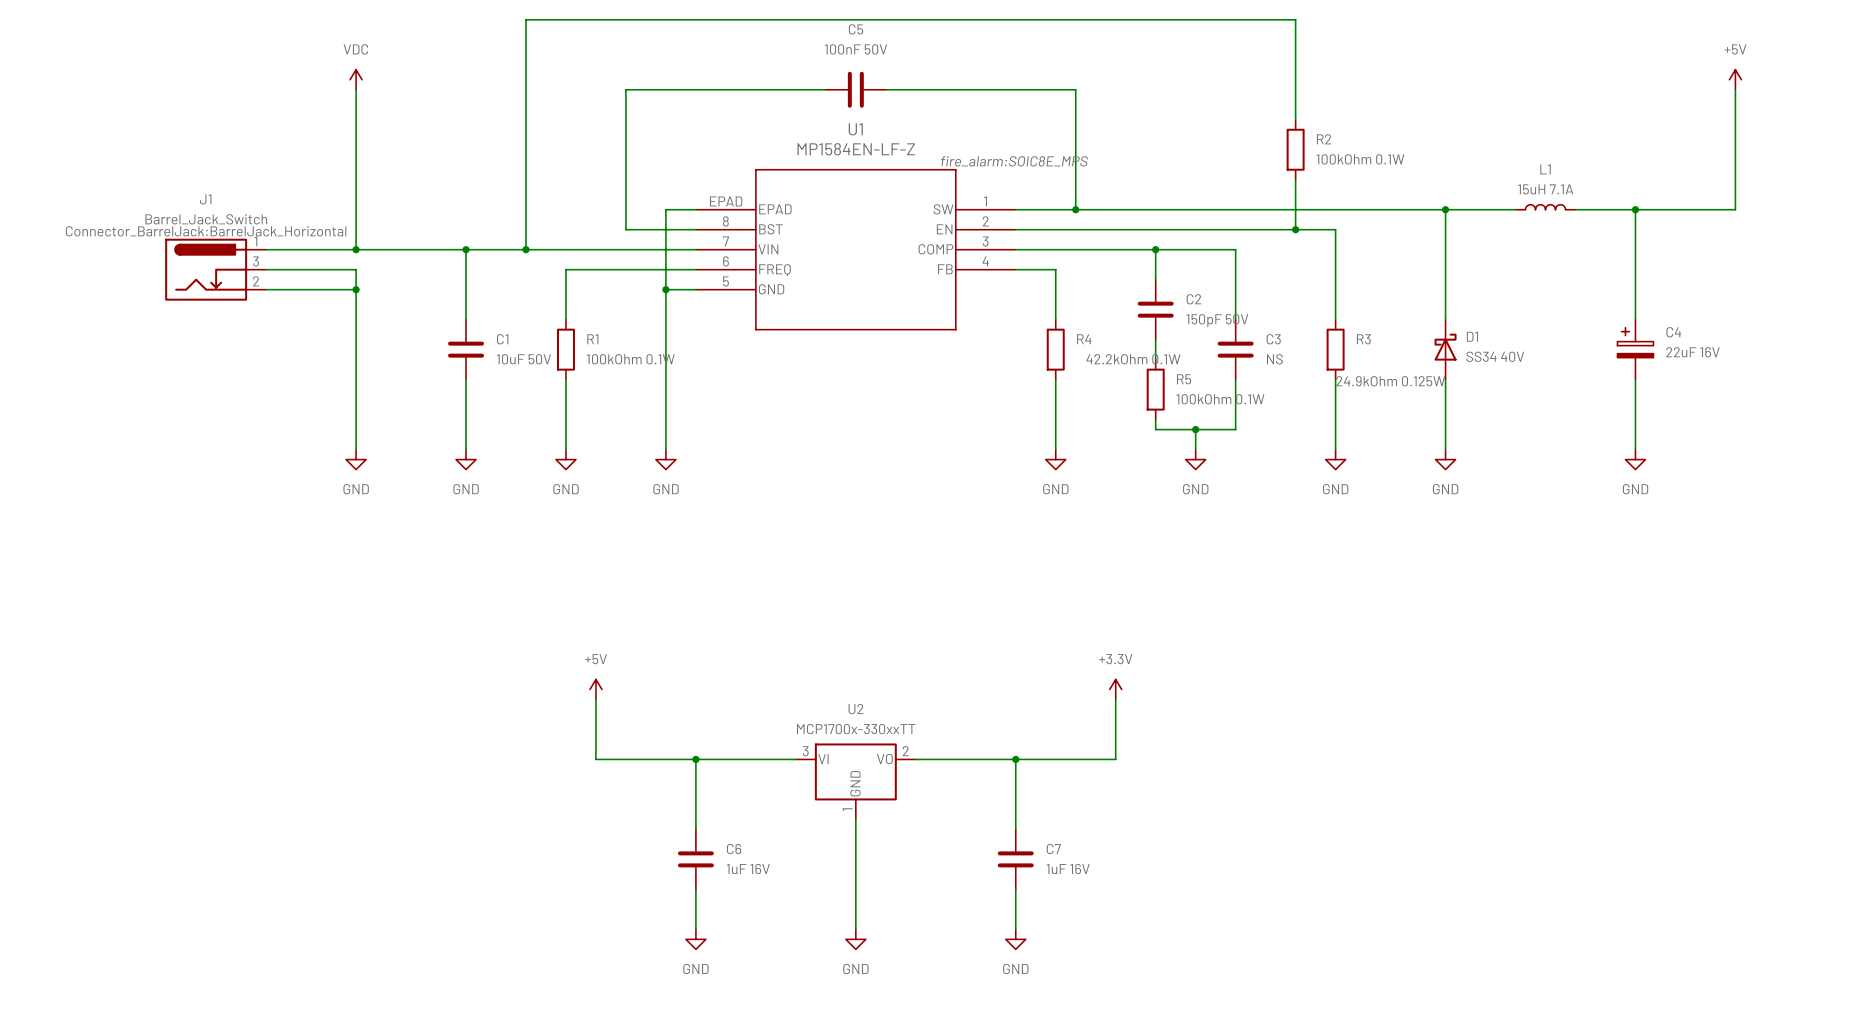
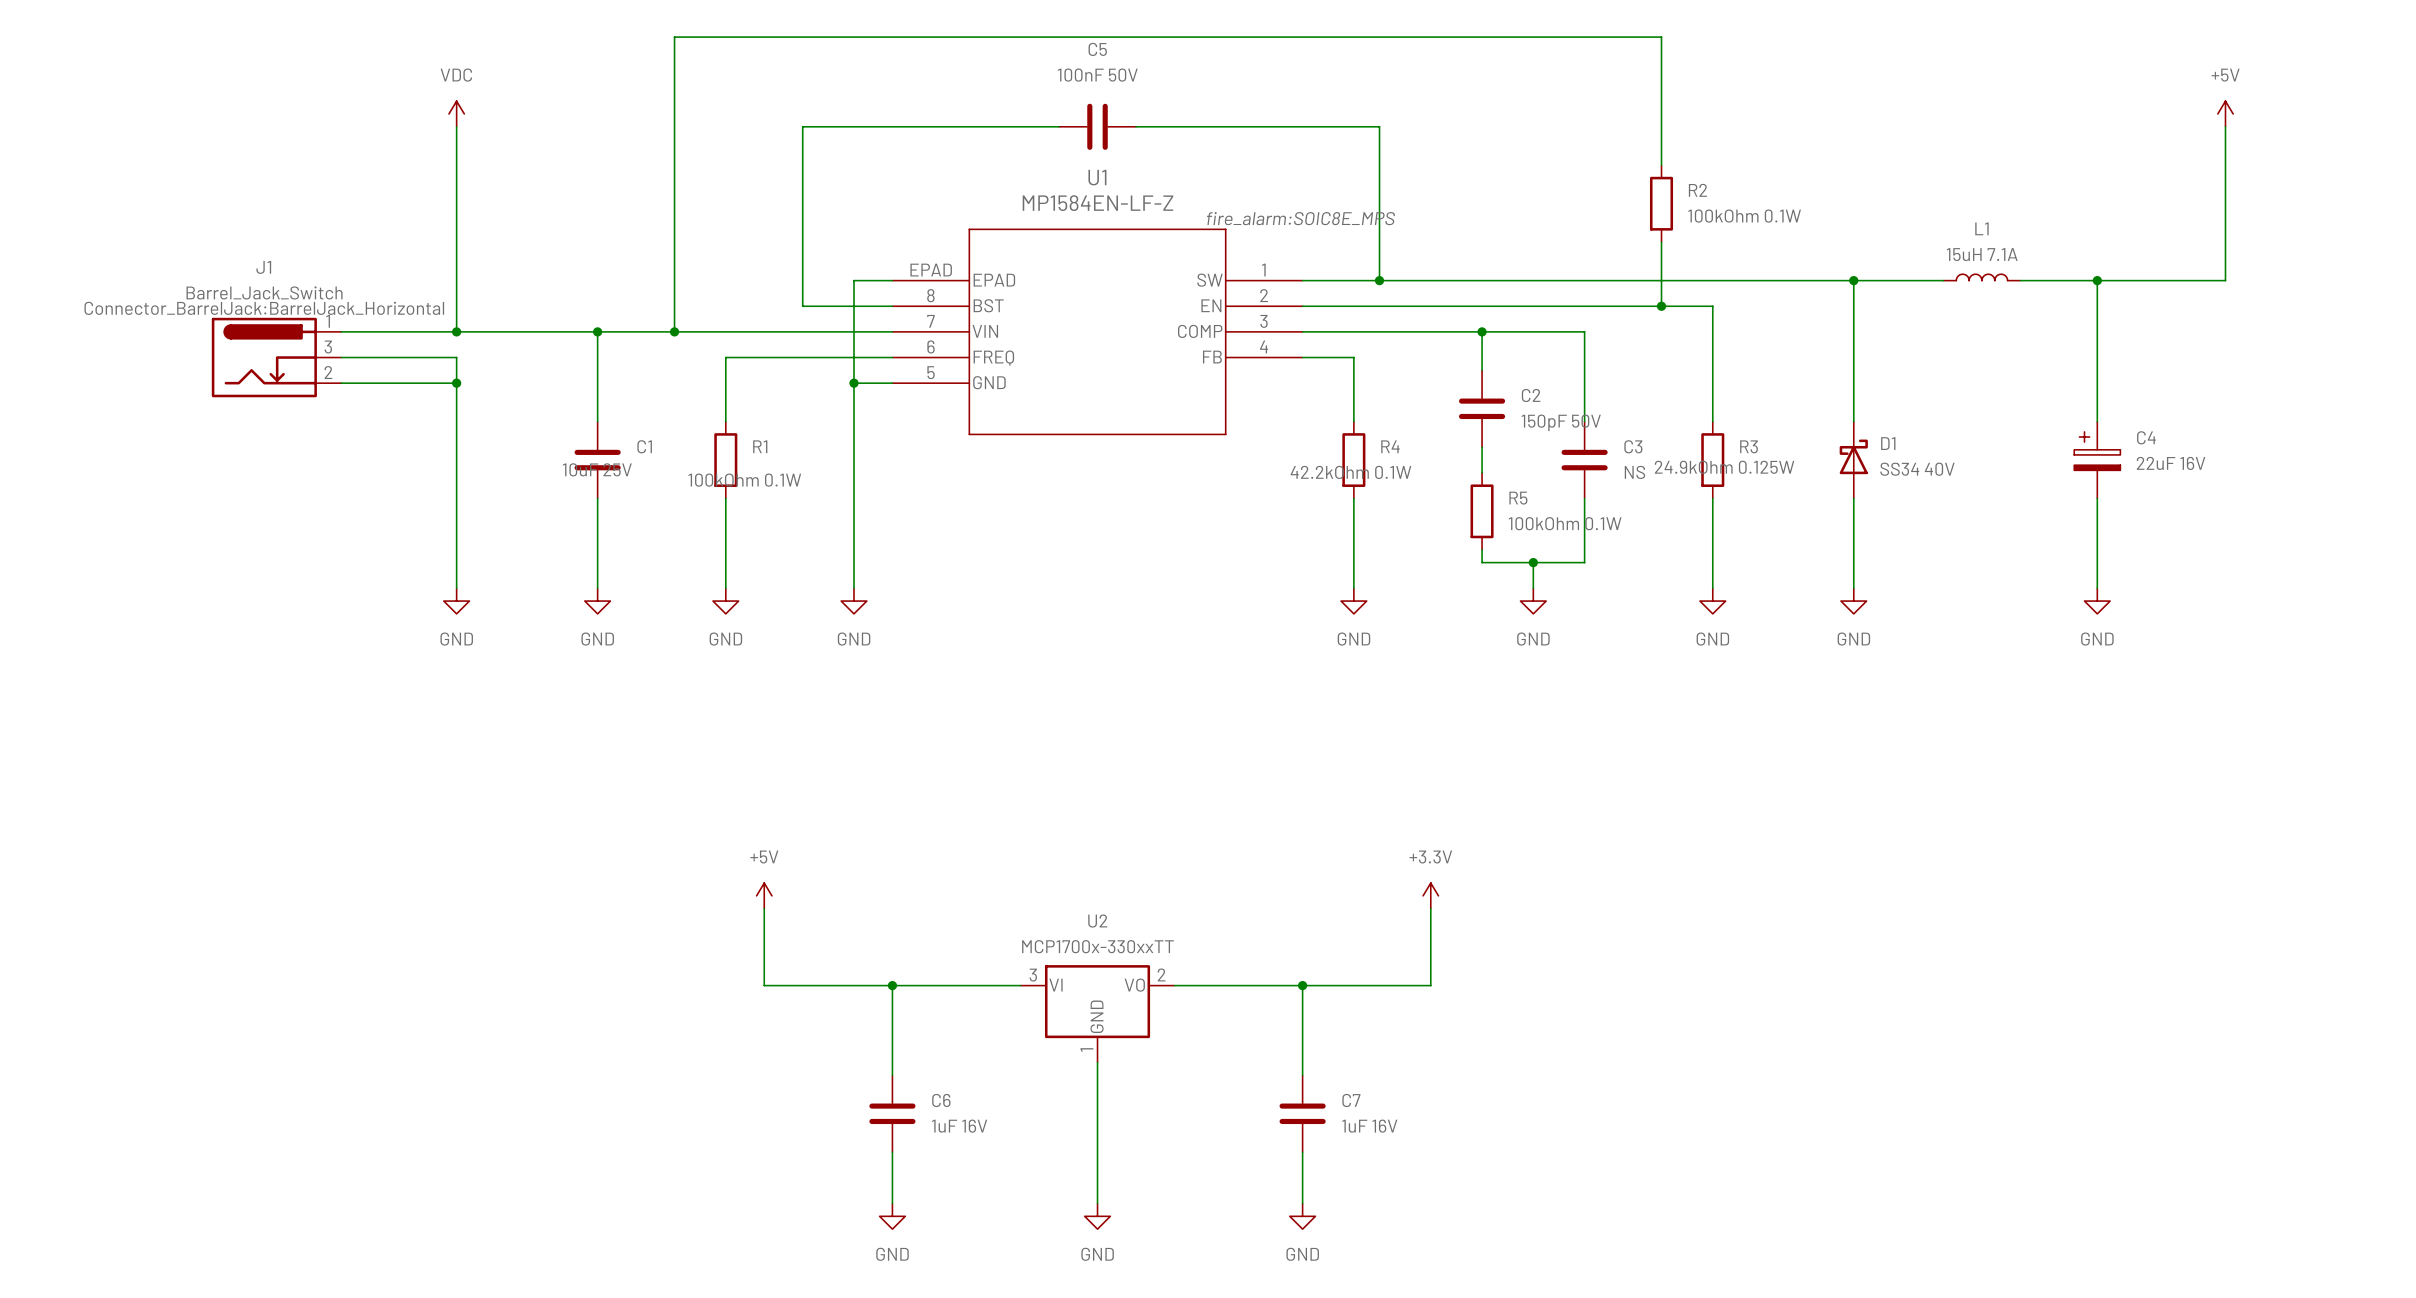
C1 value: 10uF 50V (523, 359) -> 10uF 25V (597, 469)
R1 value position: 100kOhm 0.1W (630, 359) -> 100kOhm 0.1W (744, 480)
R4 value position: 42.2kOhm 0.1W (1133, 359) -> 42.2kOhm 0.1W (1350, 472)
R3 value position: 24.9kOhm 0.125W (1390, 381) -> 24.9kOhm 0.125W (1724, 467)

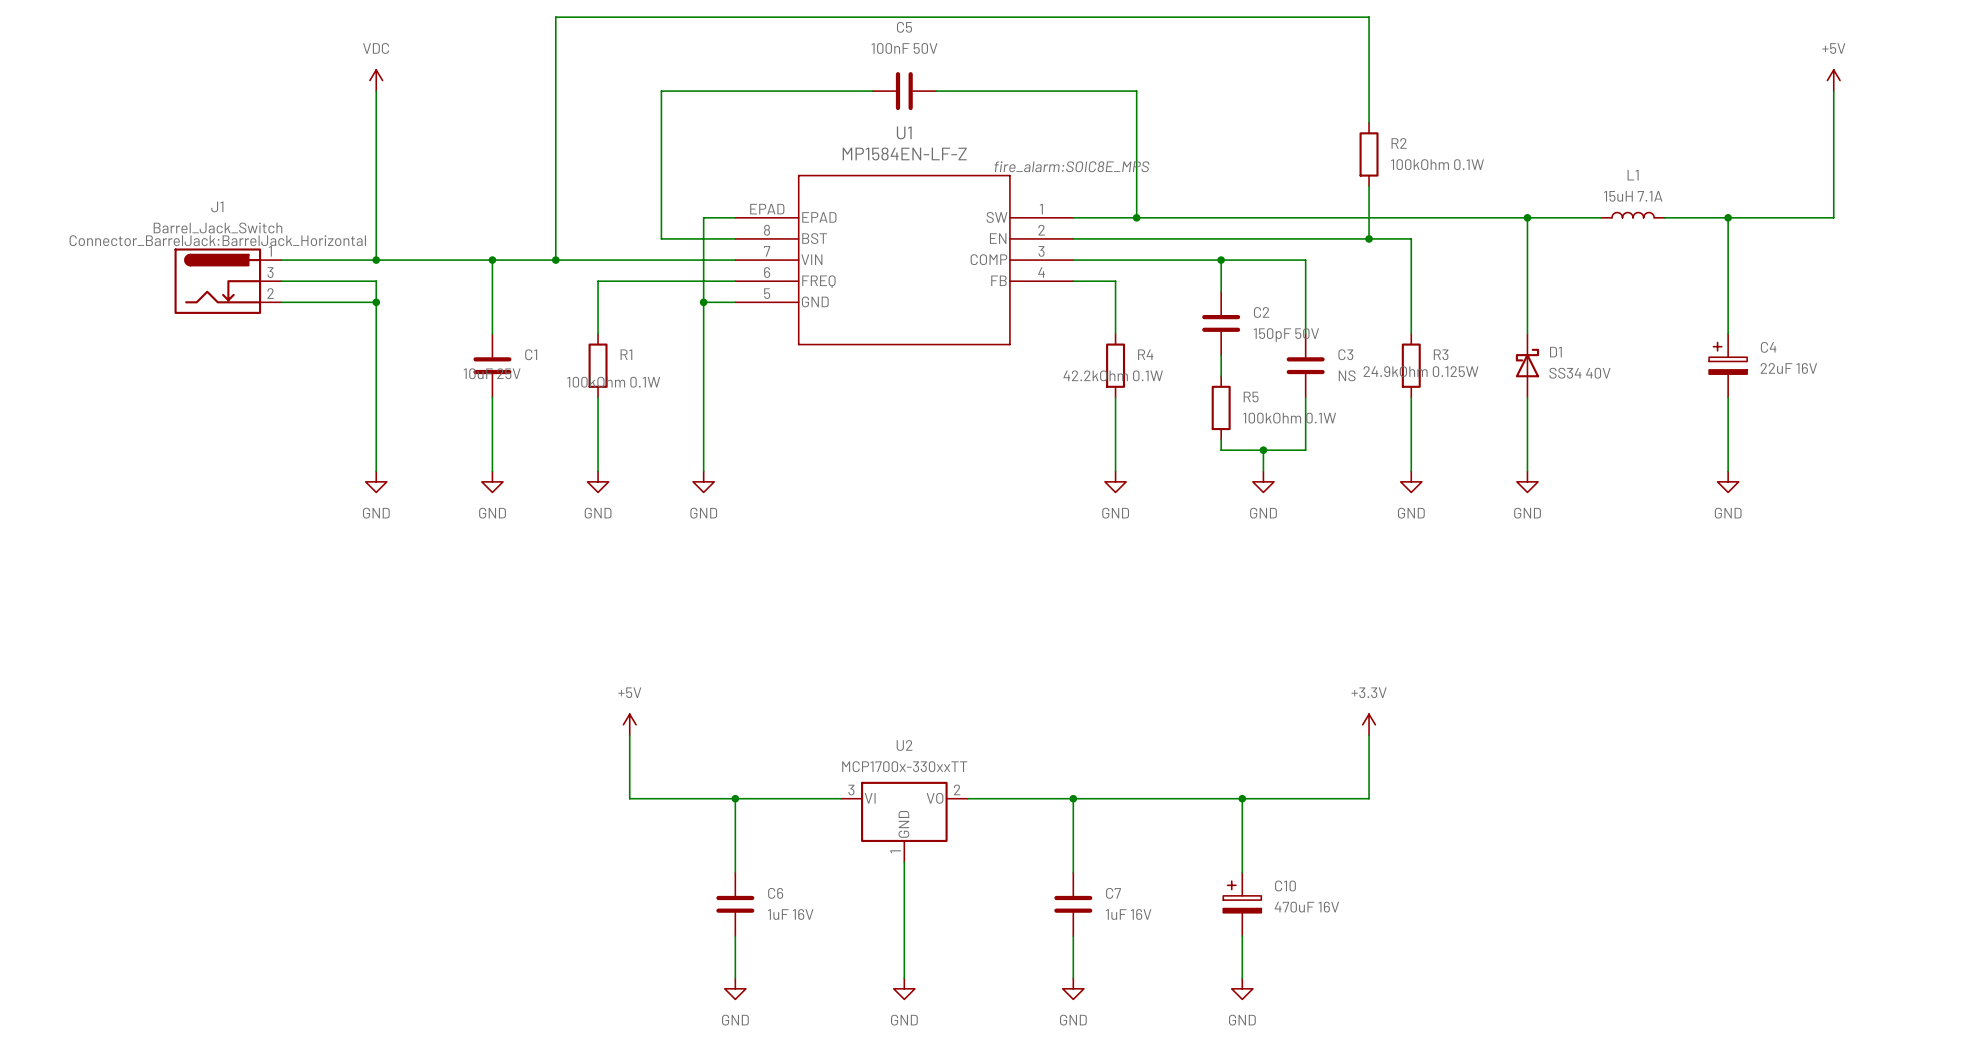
power symbol position: +3.3V (1430, 895) -> +3.3V (1369, 724)
wire: (1430, 908) (1430, 985) -> (1369, 735) (1369, 798) (1178, 798)
wire: none -> (1242, 798) (1242, 872)
junction: none -> (1242, 798)
C10: none -> 470uF 16V (1242, 904)
wire: none -> (1242, 936) (1242, 978)
power symbol: none -> GND (1242, 988)

